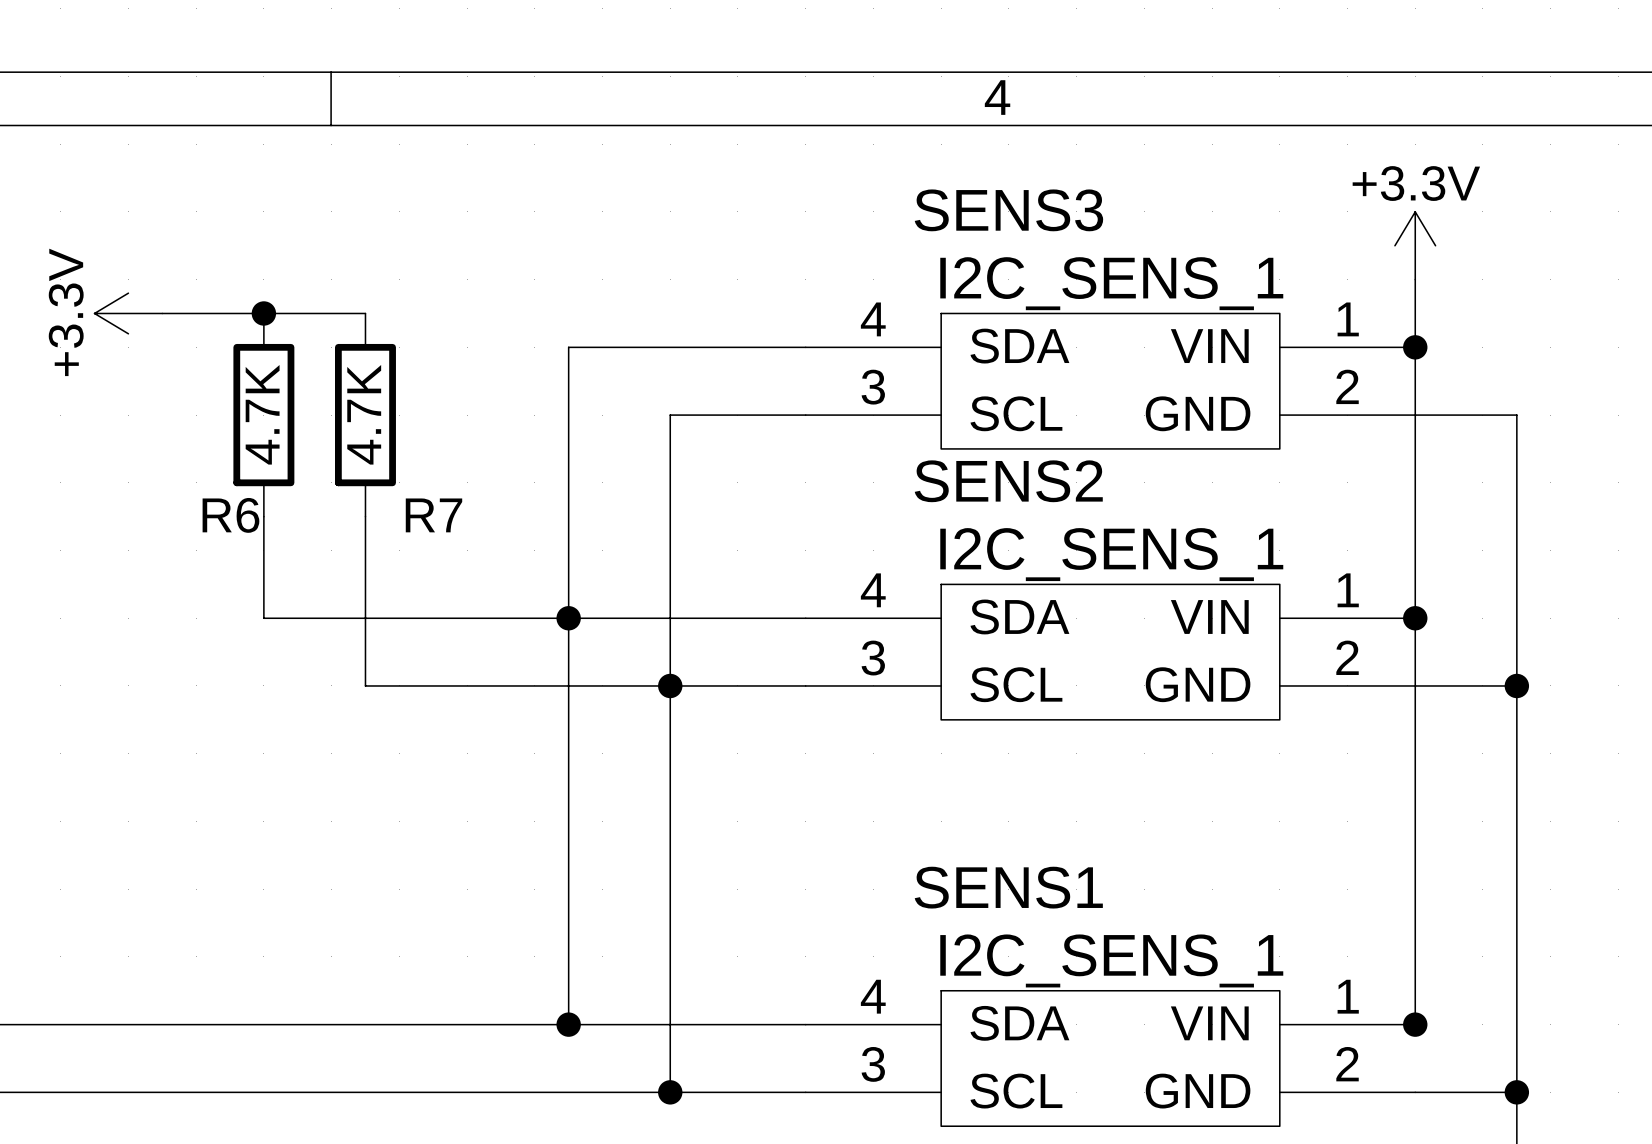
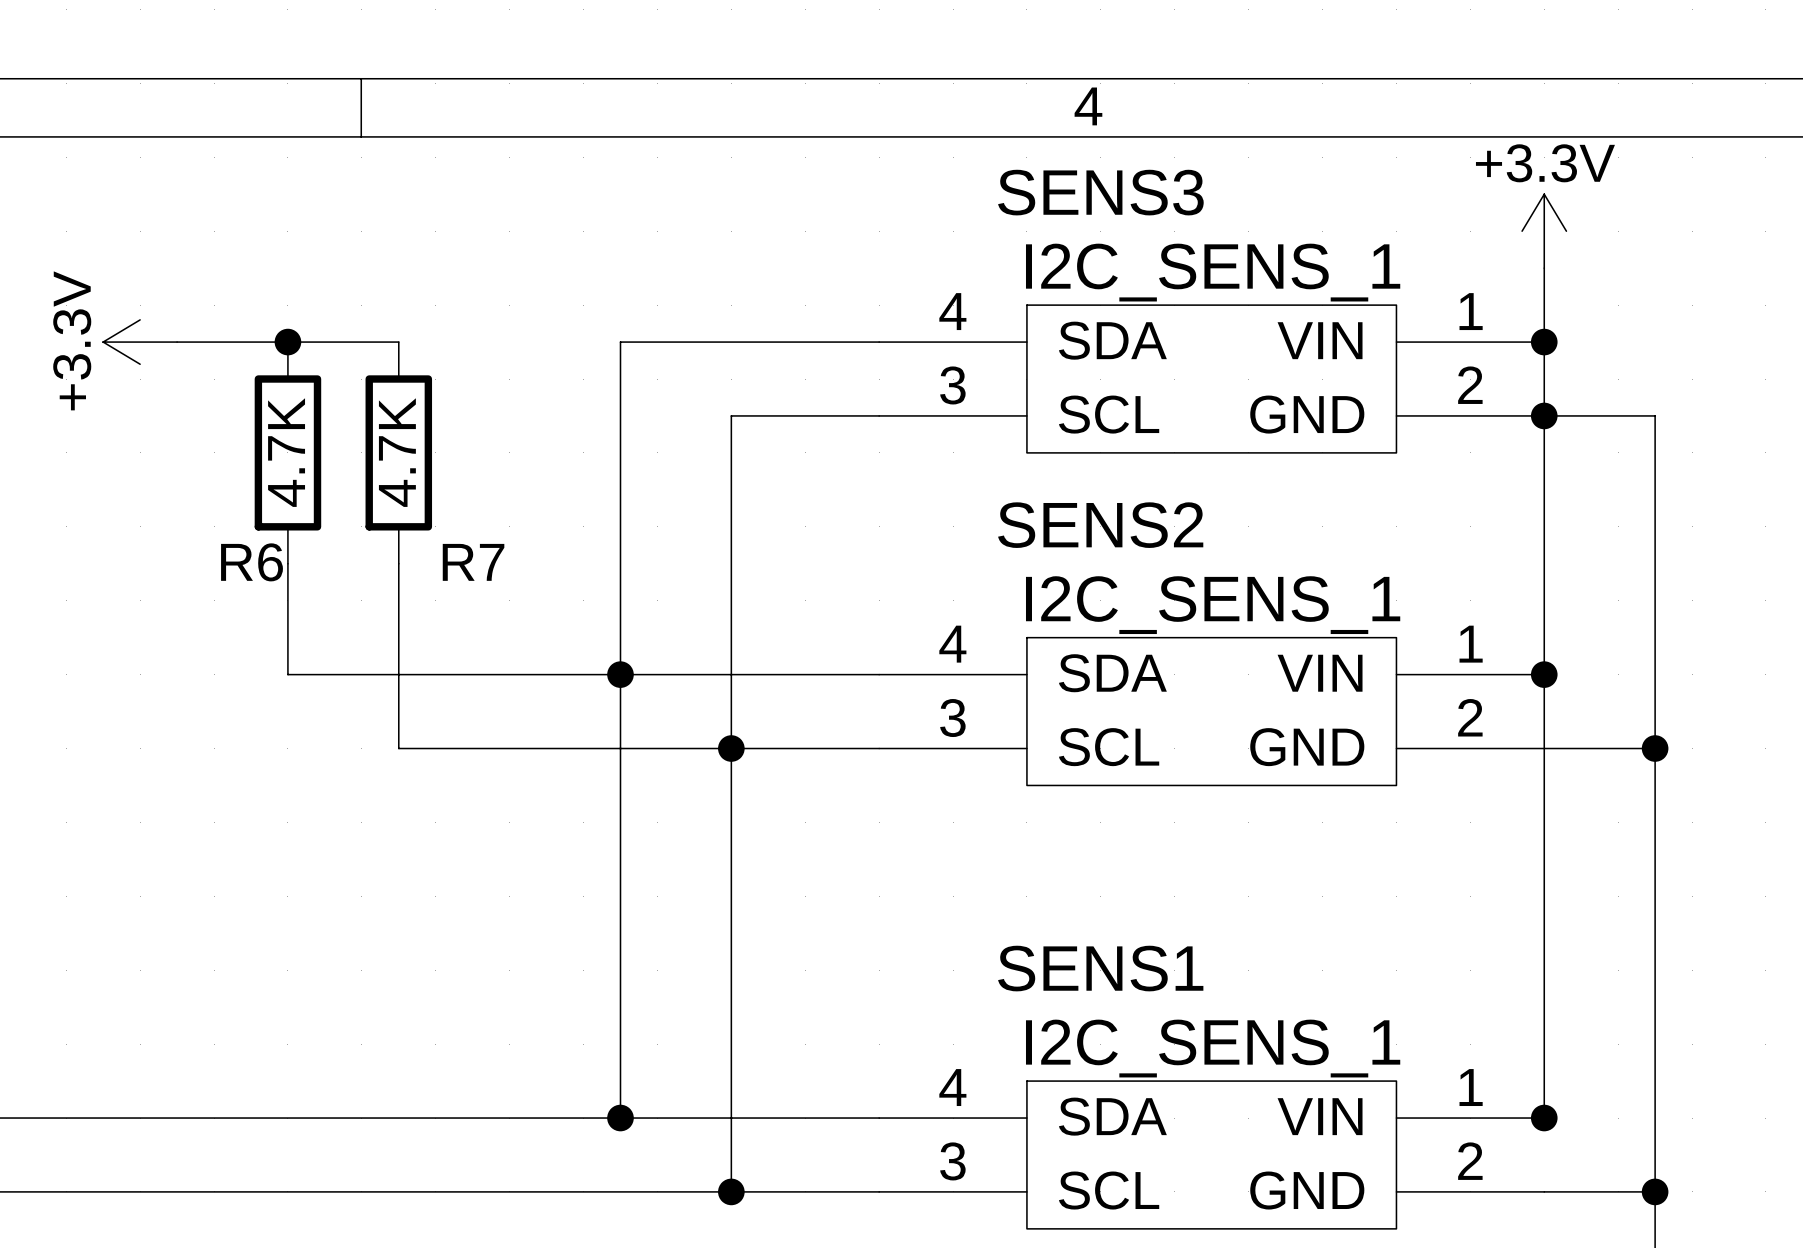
power symbol position: +3.3V (1415, 245) -> +3.3V (1544, 231)
junction: none -> (1544, 342)
wire: (568, 347) (805, 347) -> (620, 379) (620, 342) (879, 342)
junction: (1415, 347) -> none
SENS3 position: (1110, 381) -> (1211, 379)
junction: none -> (1544, 415)
wire: (670, 415) (805, 415) -> (731, 452) (731, 415) (879, 415)
wire: (1415, 415) (1516, 415) -> (1544, 415) (1655, 415) (1655, 452)

